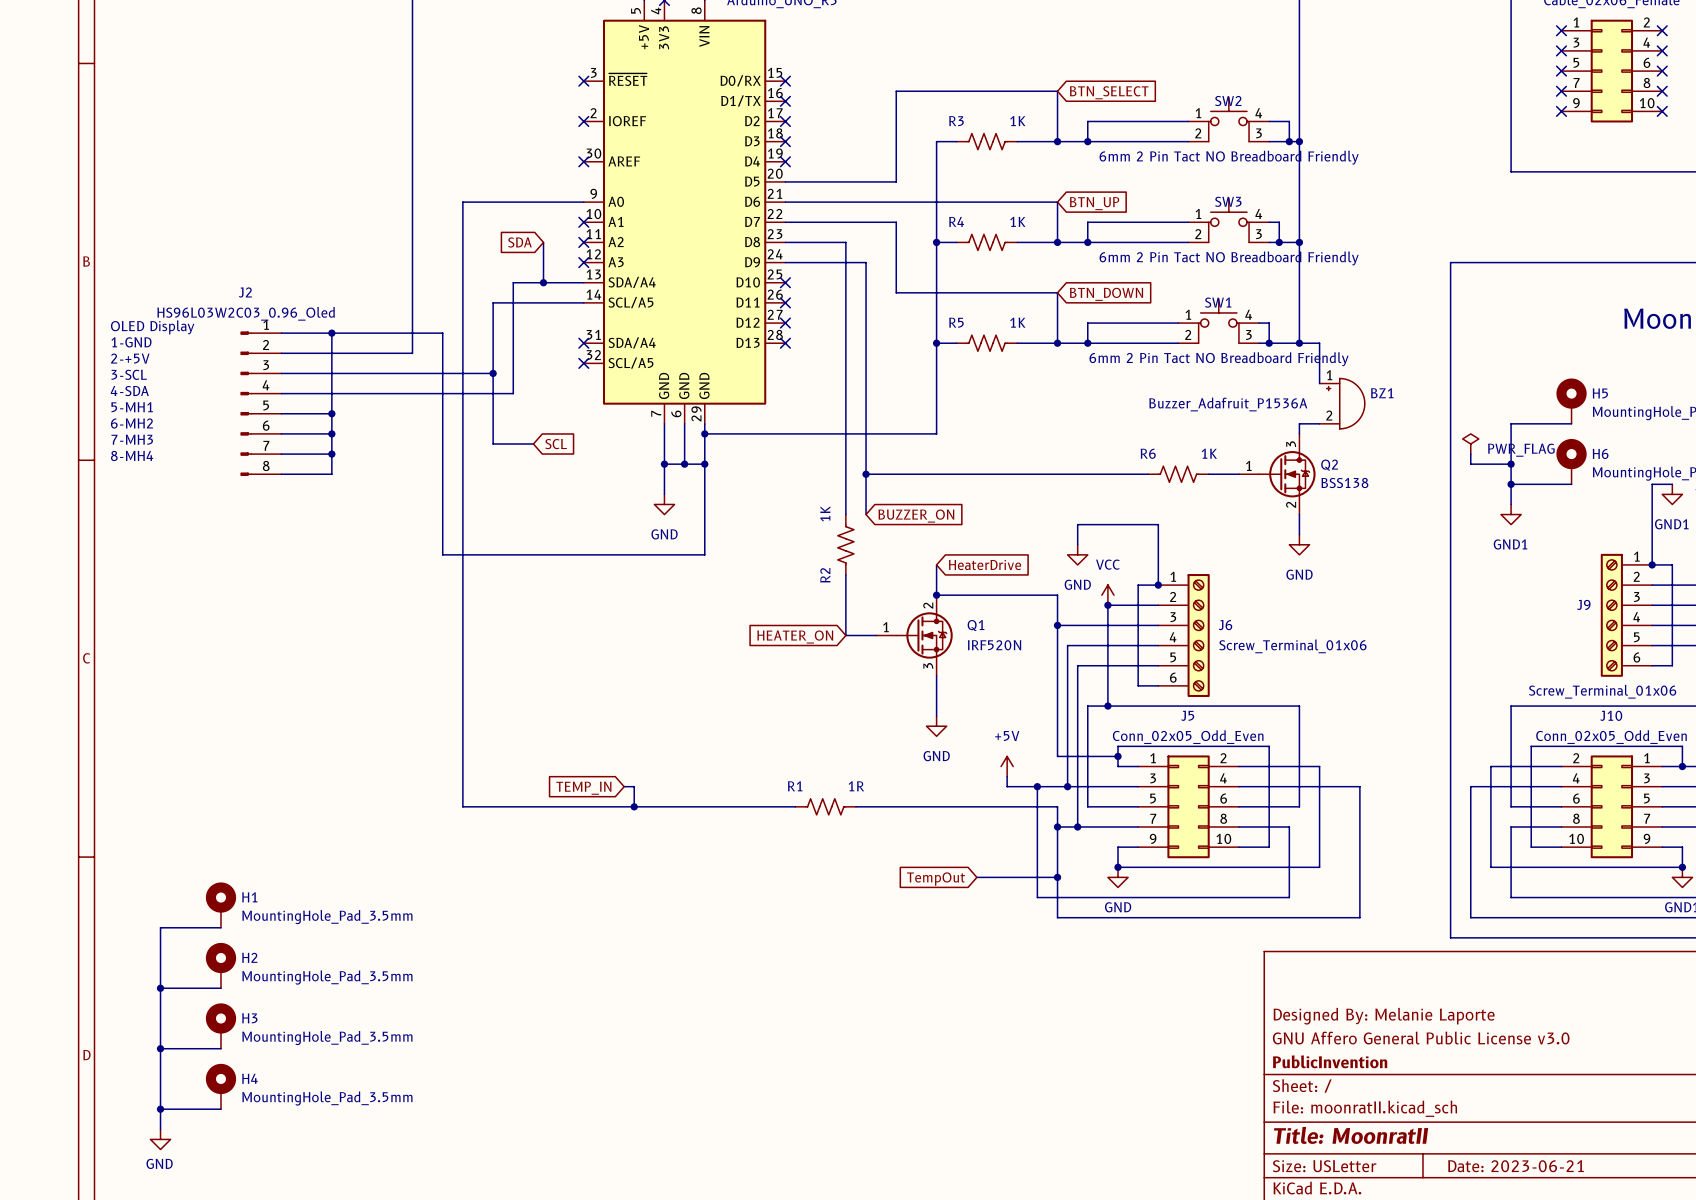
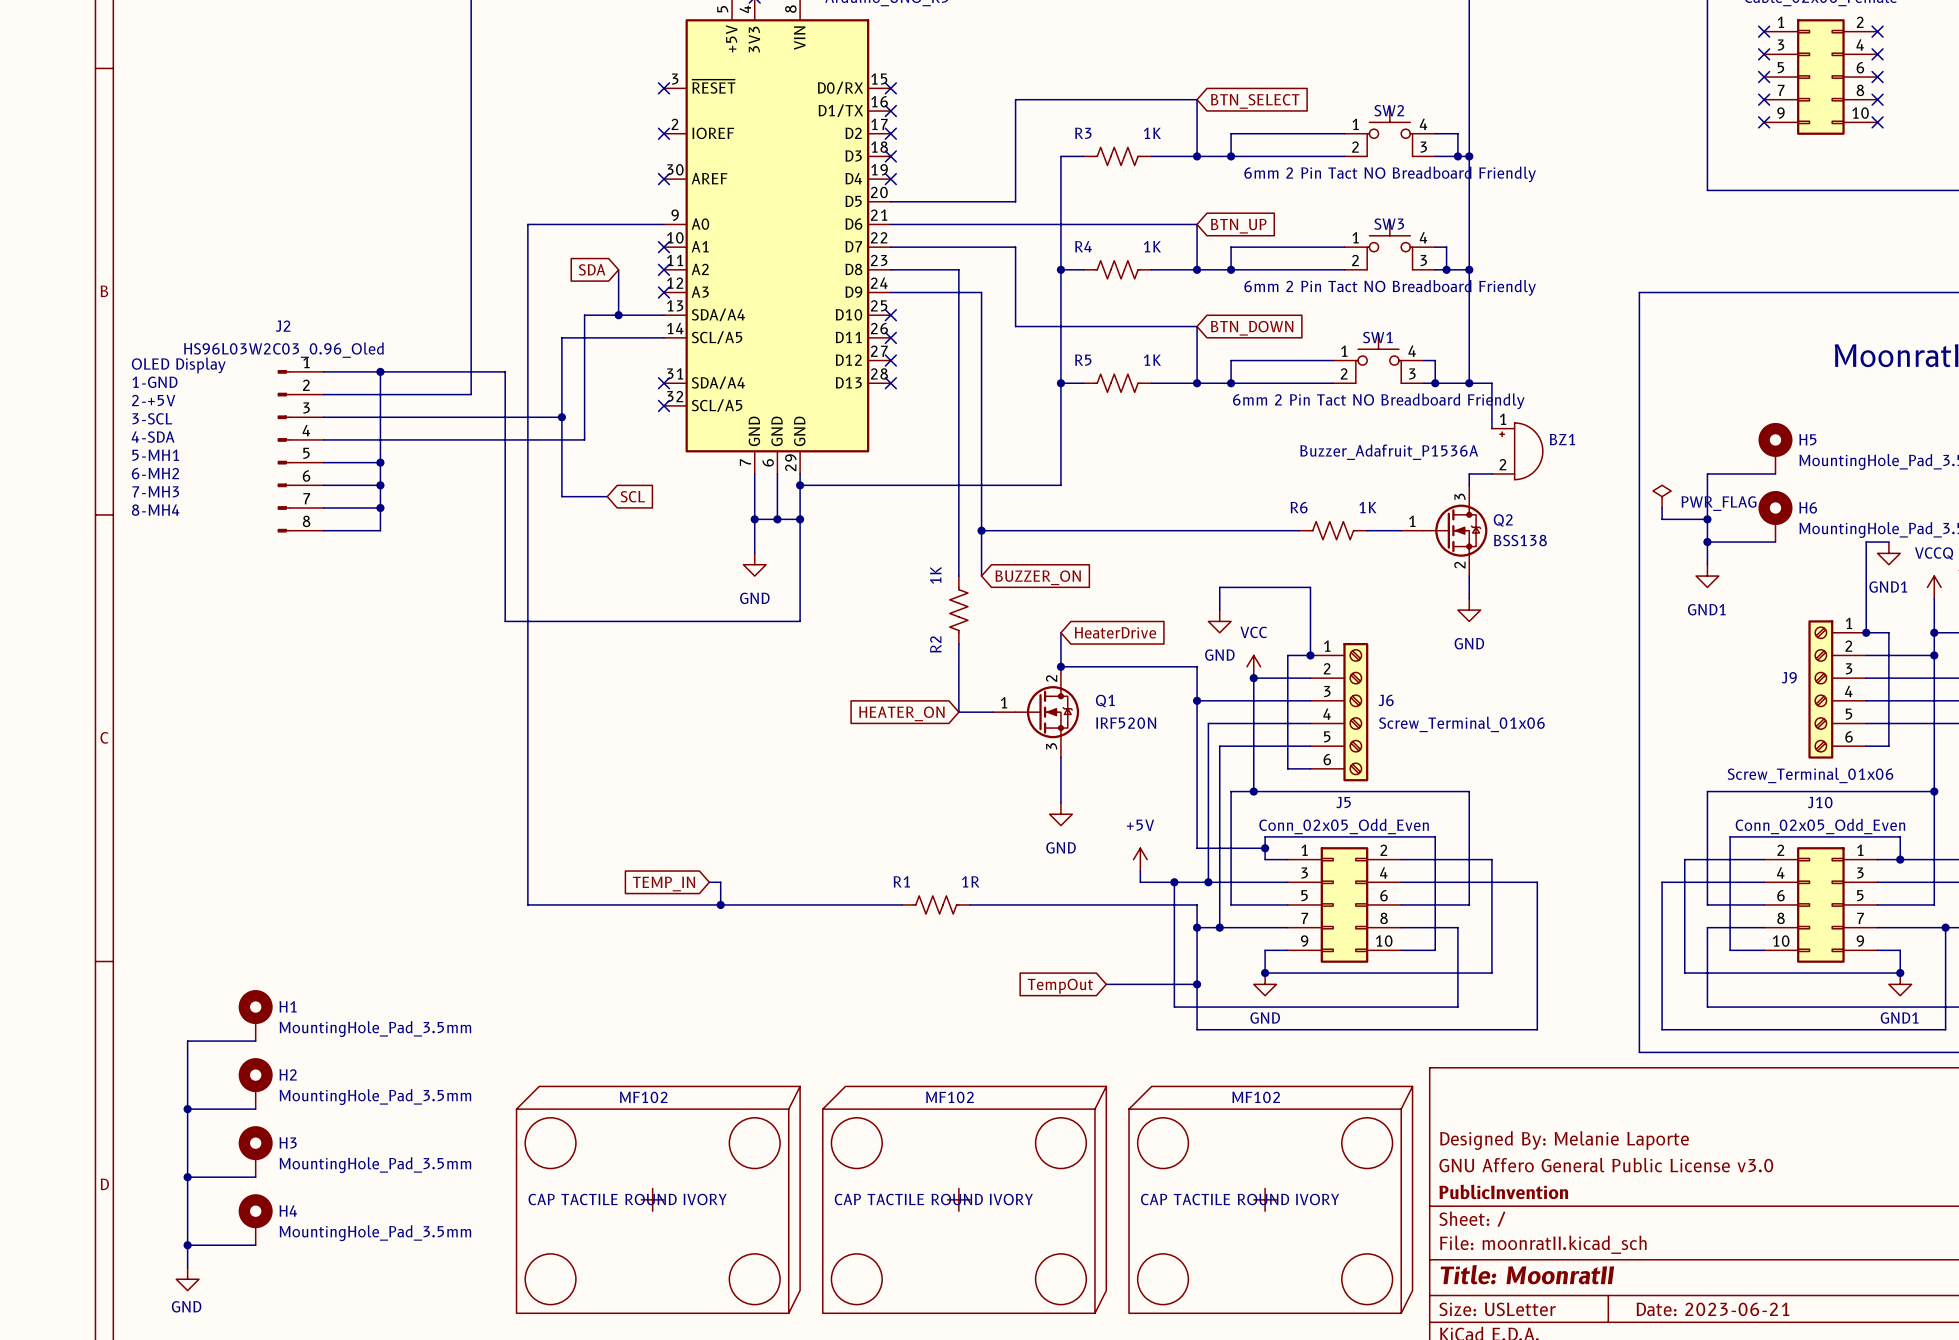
MF102: none -> CAP TACTILE ROUND IVORY (658, 1199)
MF102: none -> CAP TACTILE ROUND IVORY (964, 1199)
MF102: none -> CAP TACTILE ROUND IVORY (1270, 1199)

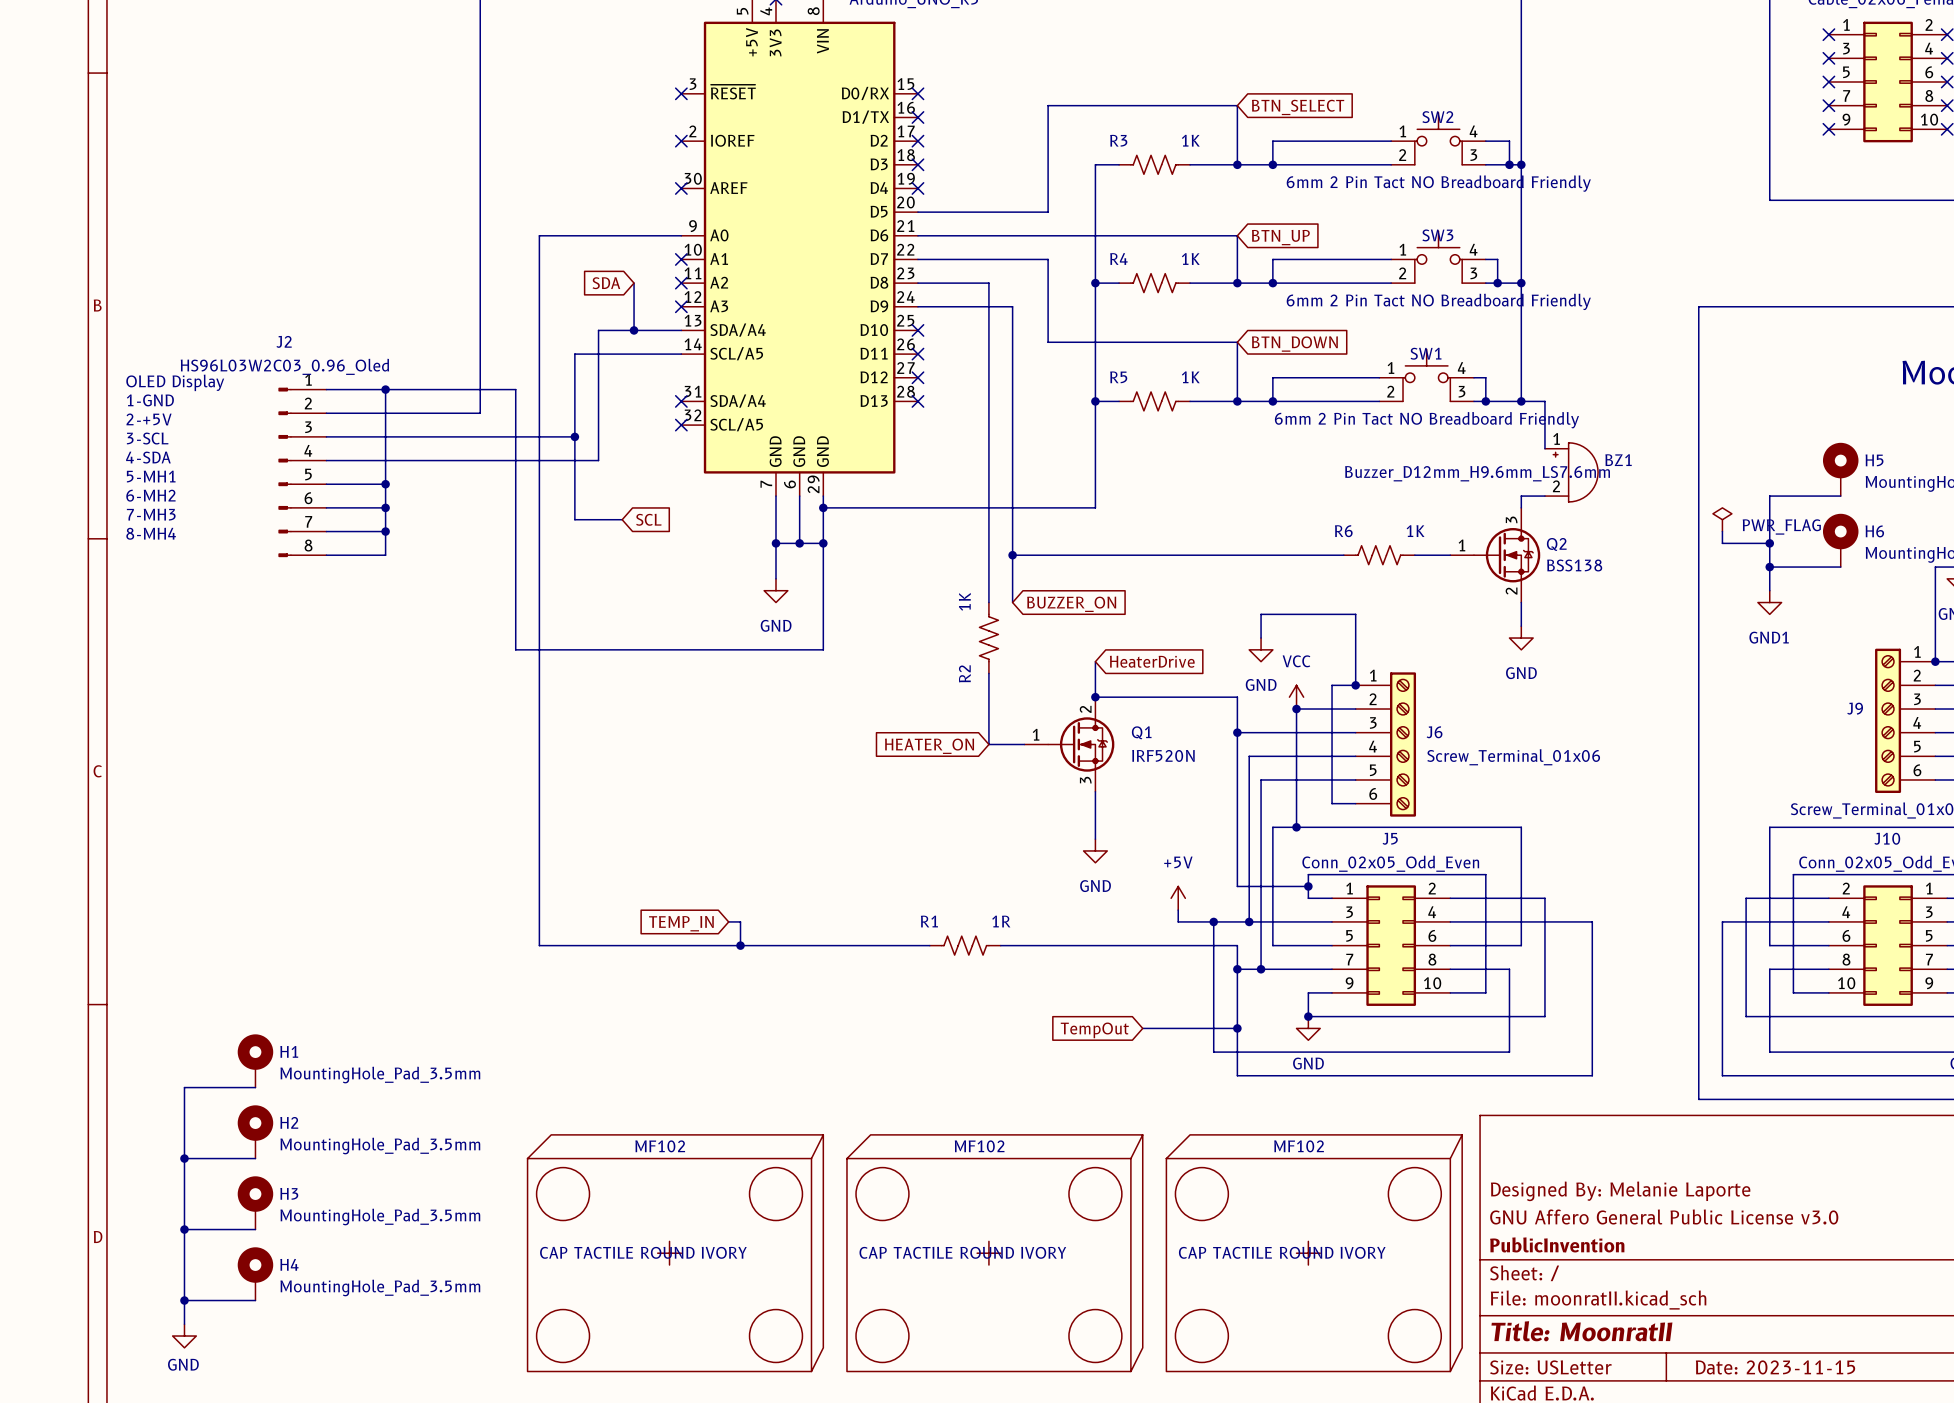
BZ1 value: Buzzer_Adafruit_P1536A (1389, 452) -> Buzzer_D12mm_H9.6mm_LS7.6mm (1477, 473)
title block: Date: 2023-06-21 (1712, 1309) -> Date: 2023-11-15 (1775, 1367)

